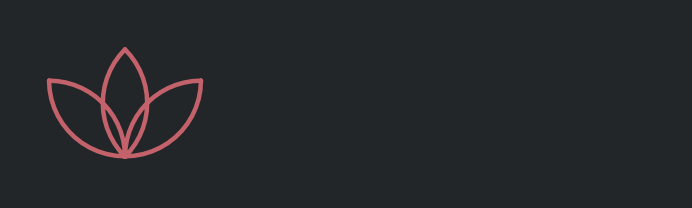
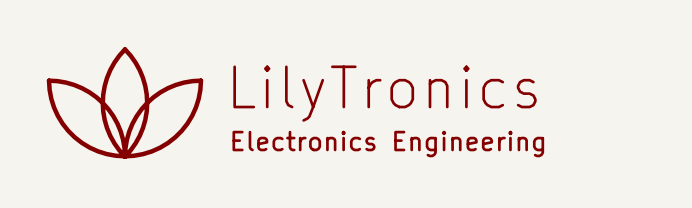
part text: none -> LilyTronics (385, 93)
part text: none -> Electronics Engineering (388, 144)

